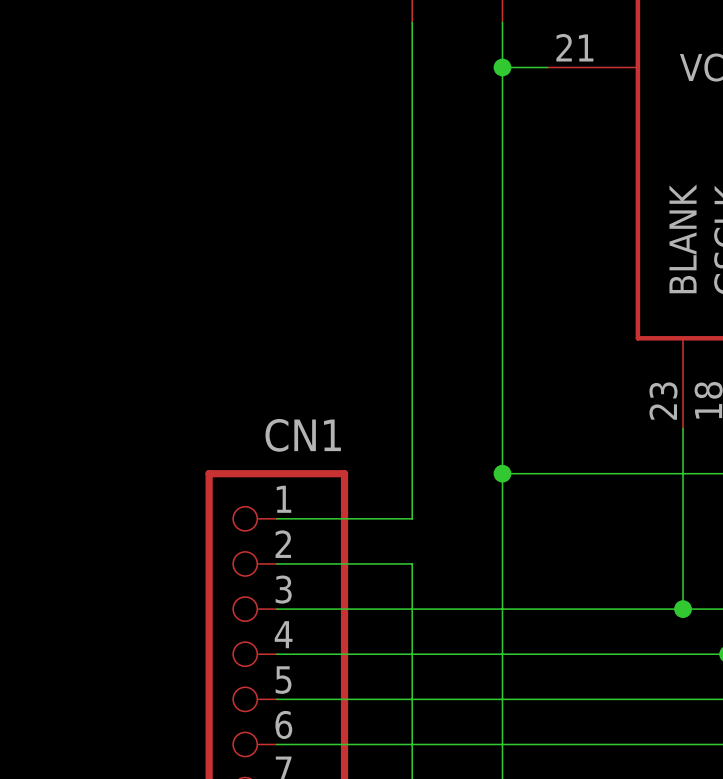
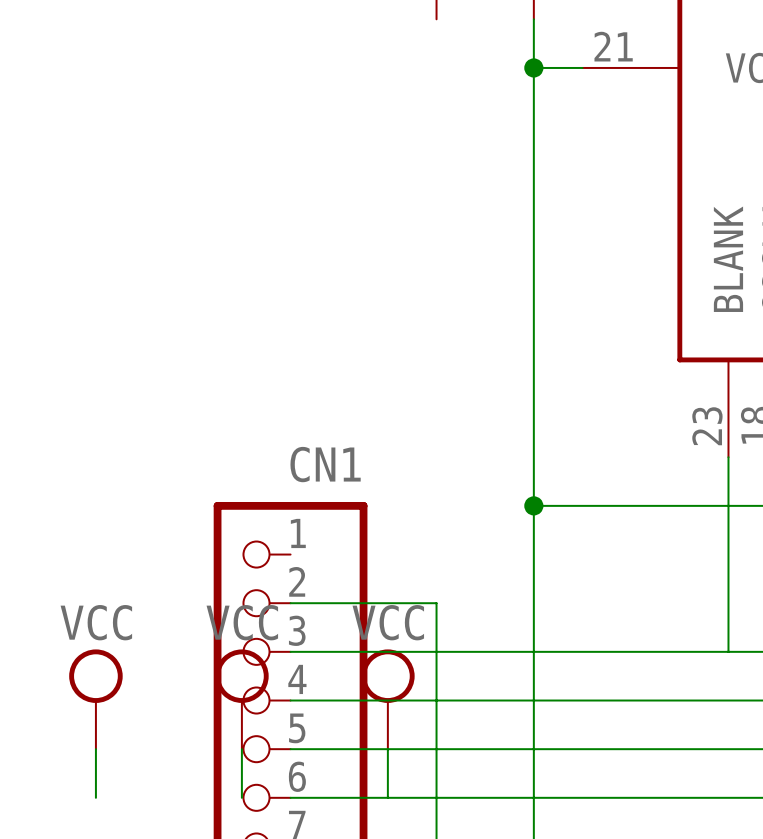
wire: (412, 22) (412, 518) (276, 518) -> none
junction: (683, 609) -> none
power symbol: none -> VCC (95, 699)
power symbol: none -> VCC (241, 699)
power symbol: none -> VCC (387, 699)
wire: none -> (95, 749) (95, 797)
wire: none -> (241, 749) (241, 797)
wire: none -> (387, 749) (387, 797)

